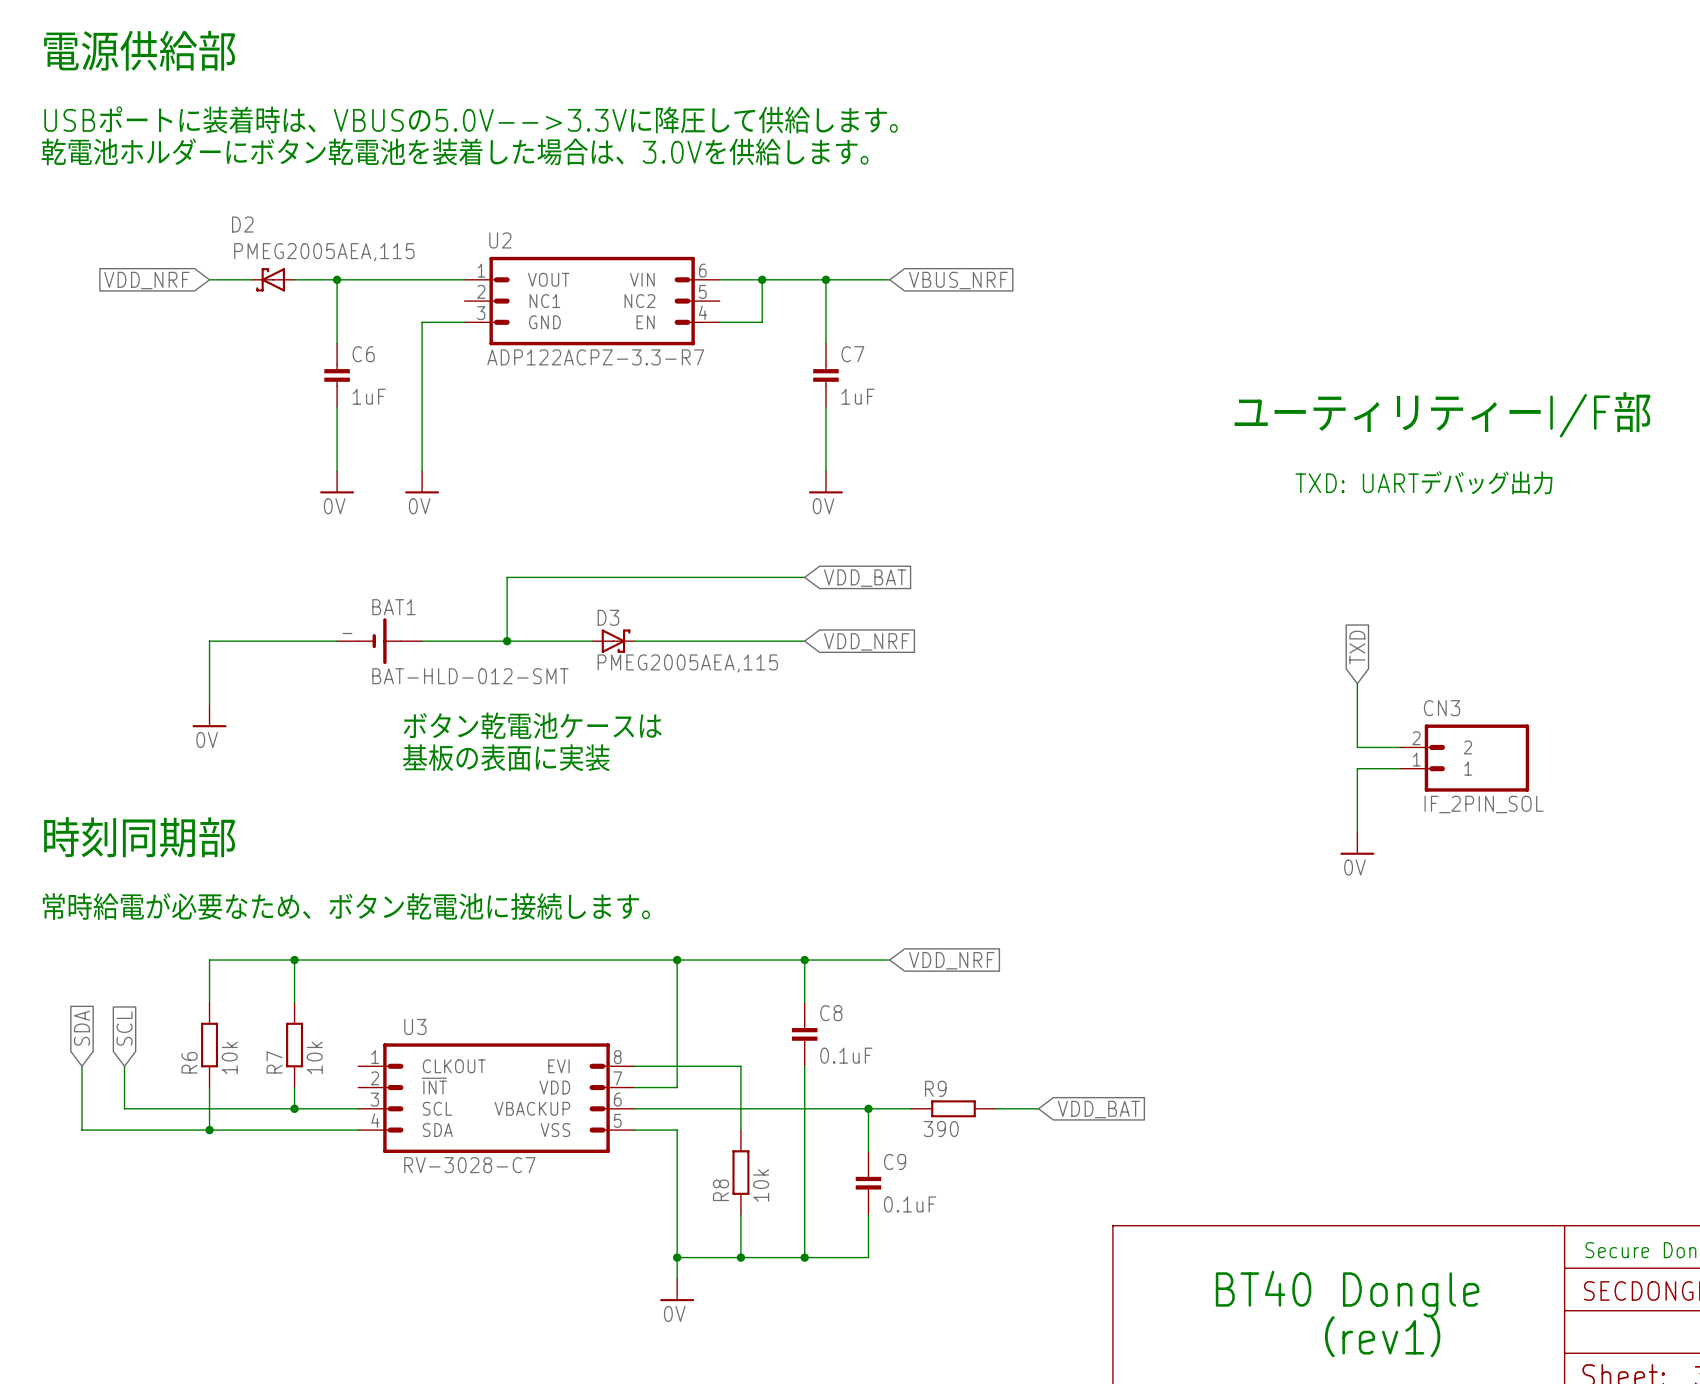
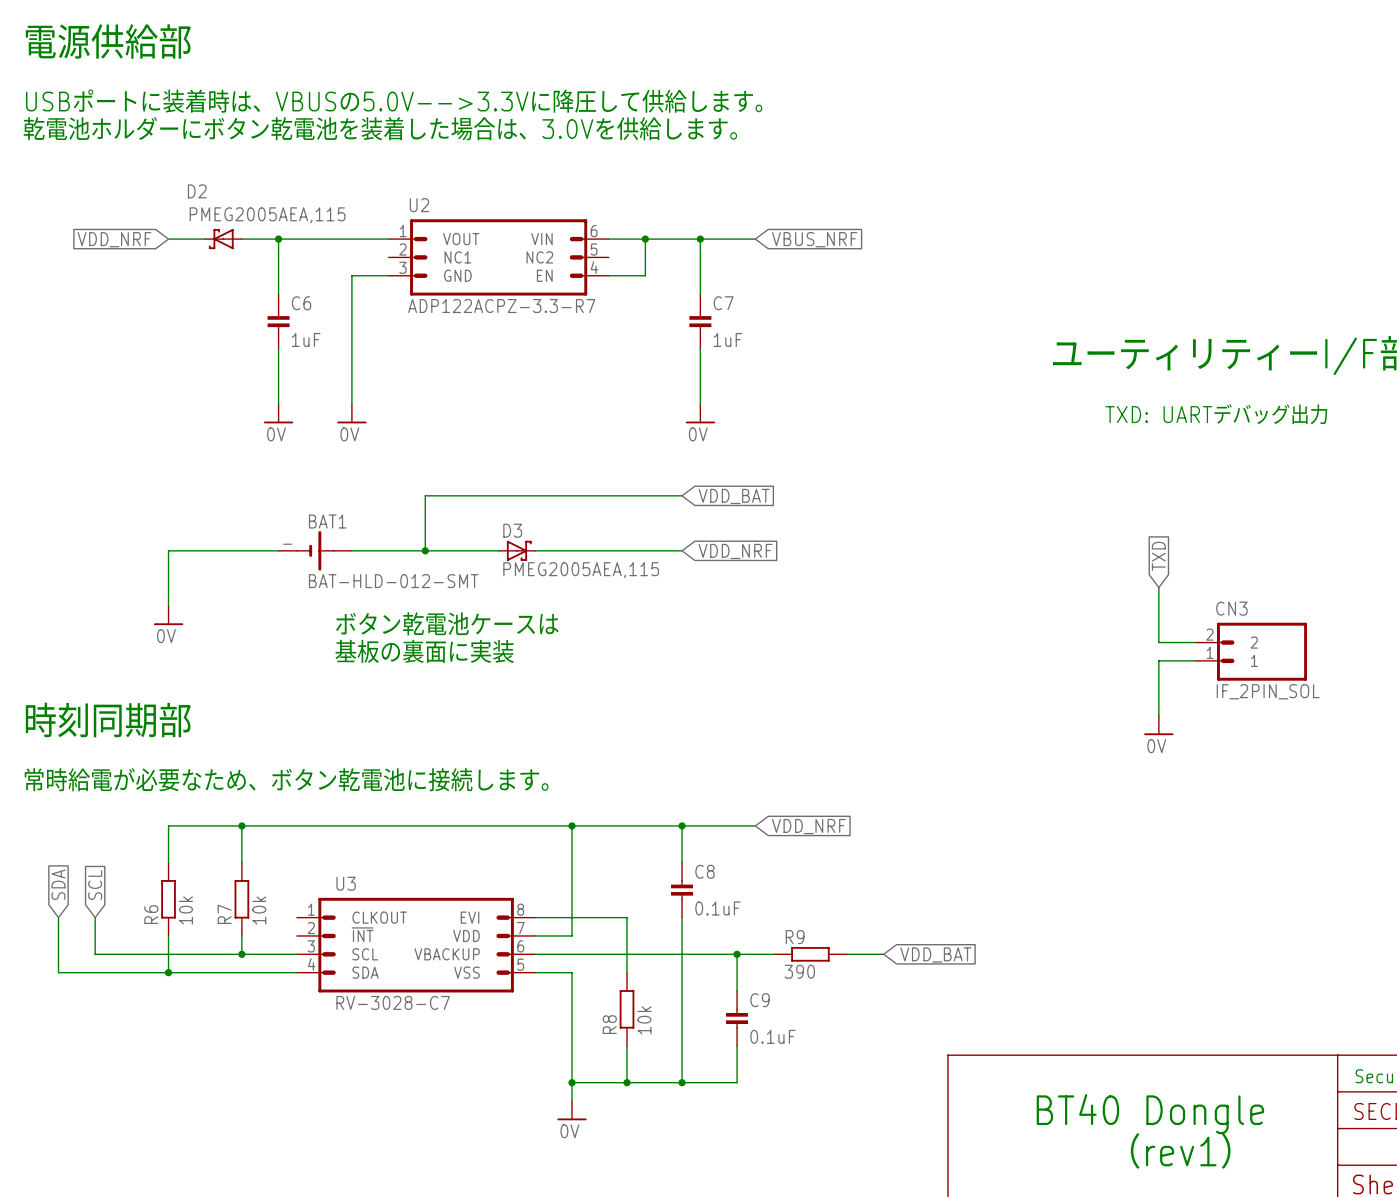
text: 基板の表面に実装 (506, 757) -> 基板の裏面に実装 (424, 651)

